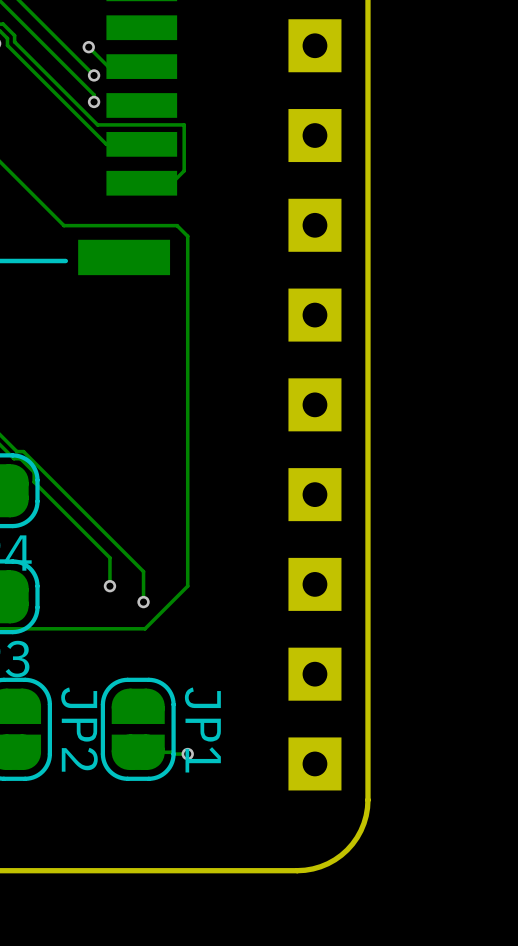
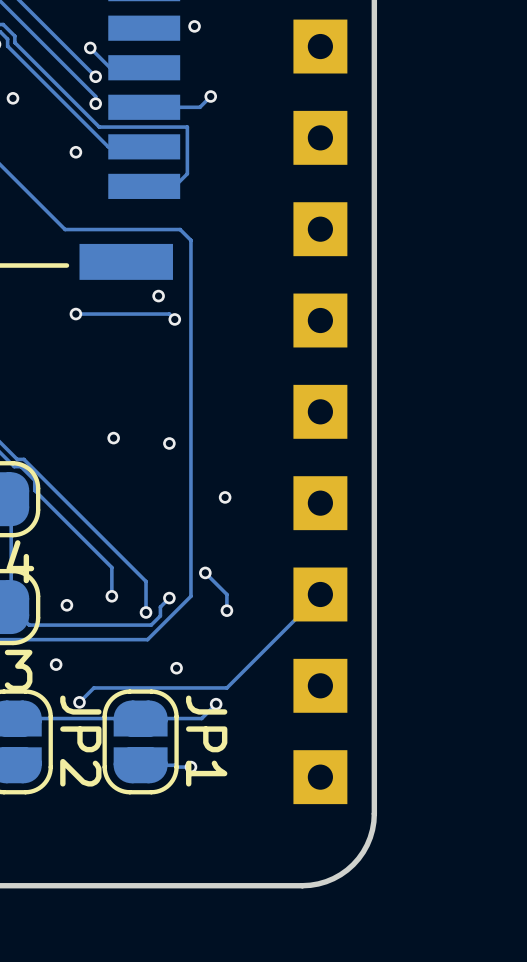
via: none -> (194, 26)
track: none -> (210, 96) (199, 107) (144, 107)
via: none -> (210, 96)
via: none -> (12, 98)
via: none -> (75, 152)
via: none -> (158, 296)
track: none -> (75, 314) (169, 314) (174, 319)
via: none -> (75, 314)
via: none -> (174, 319)
via: none -> (113, 438)
via: none -> (169, 443)
via: none -> (225, 497)
track: none -> (11, 499) (11, 607) (29, 625) (151, 625) (160, 615) (160, 607) (169, 598)
track: none -> (205, 572) (226, 594) (226, 610)
via: none -> (205, 572)
track: none -> (320, 594) (226, 687) (93, 687) (79, 702)
via: none -> (169, 598)
via: none -> (66, 605)
via: none -> (226, 610)
via: none -> (56, 664)
via: none -> (176, 668)
via: none -> (79, 702)
track: none -> (216, 704) (201, 718) (14, 718)
via: none -> (216, 704)

